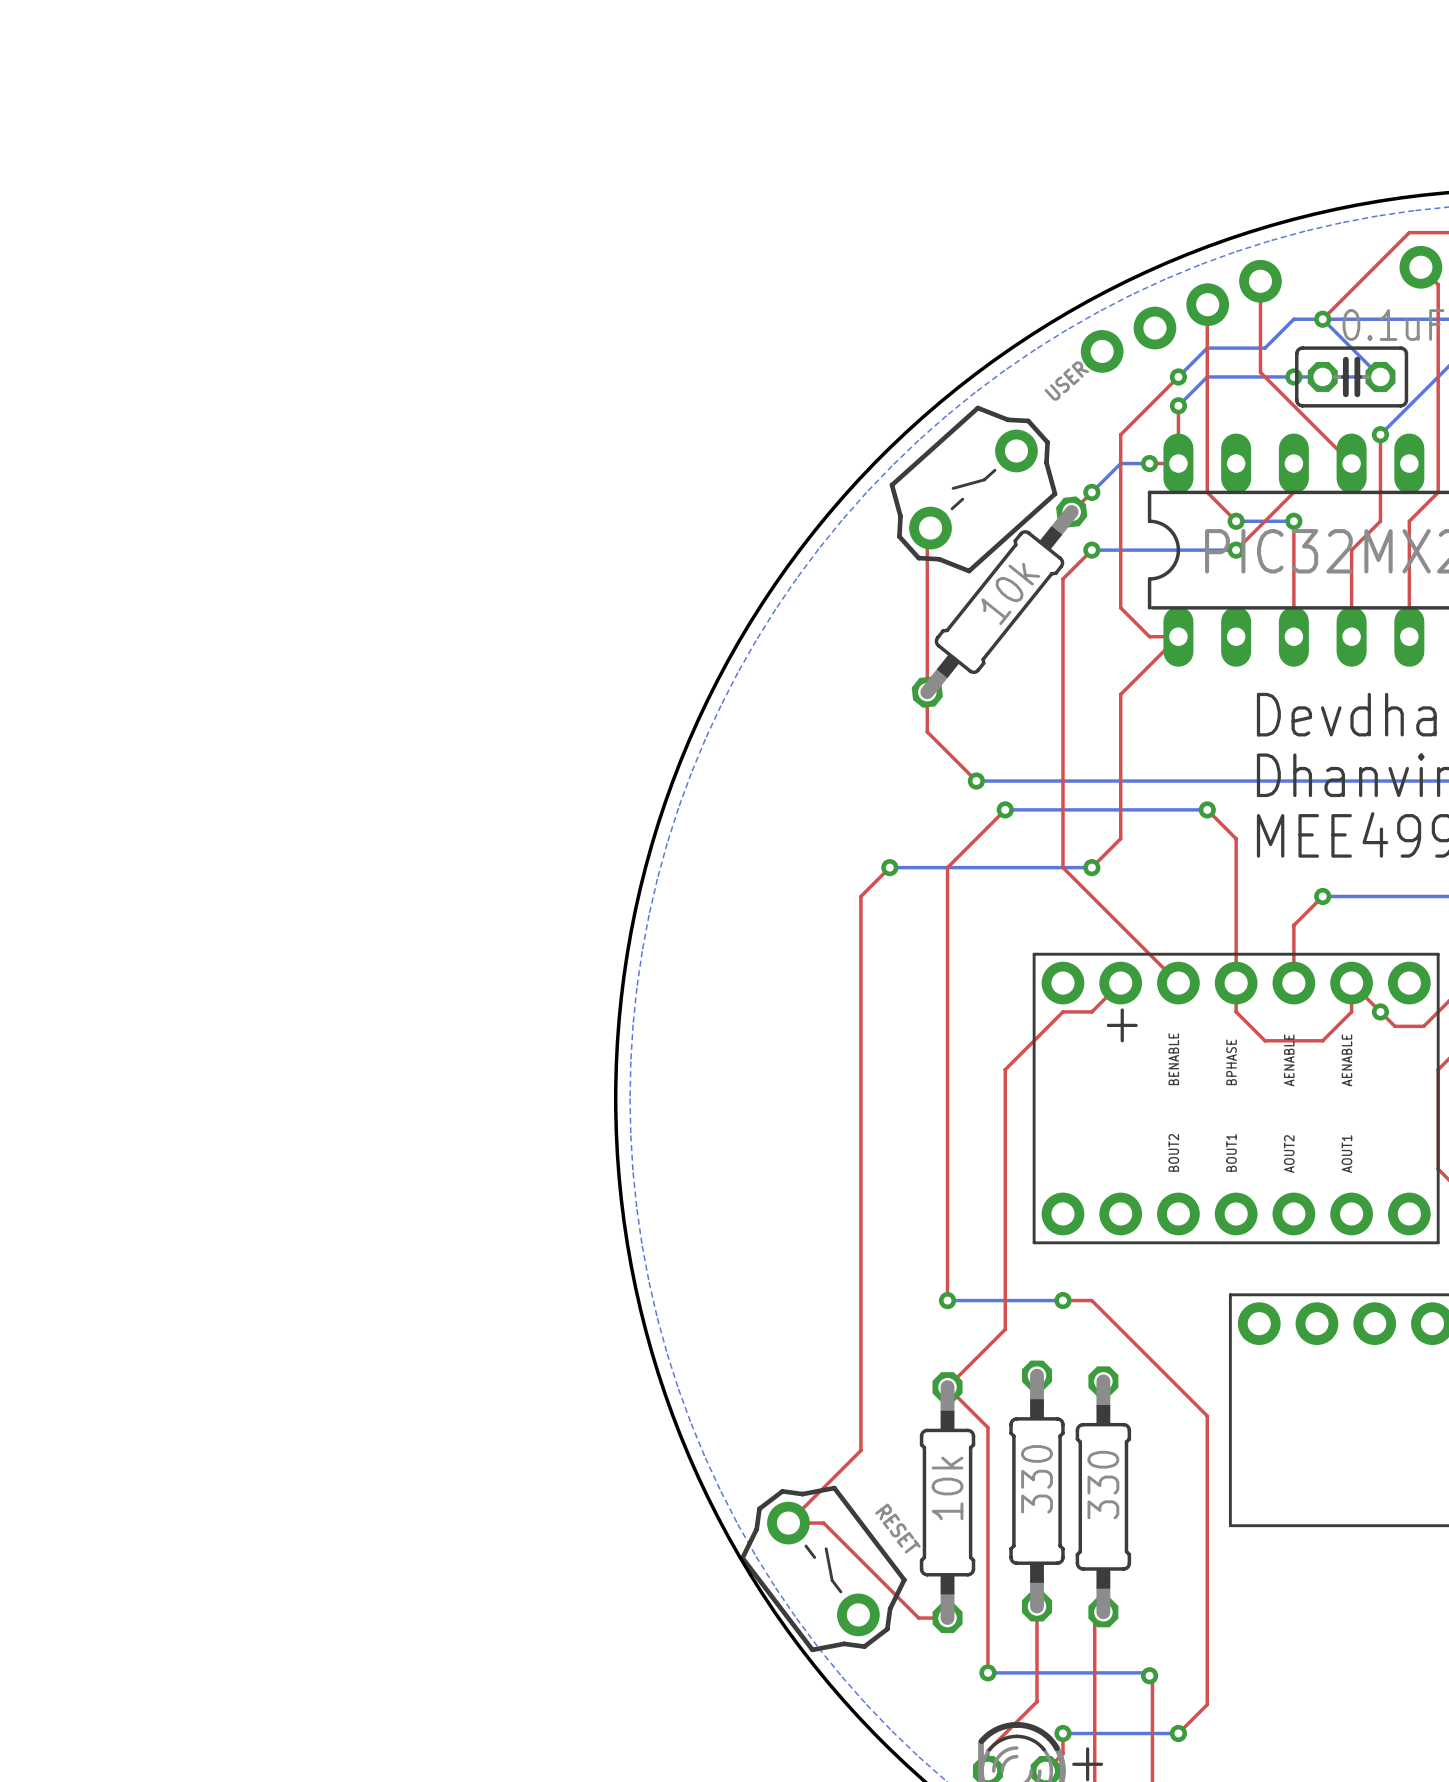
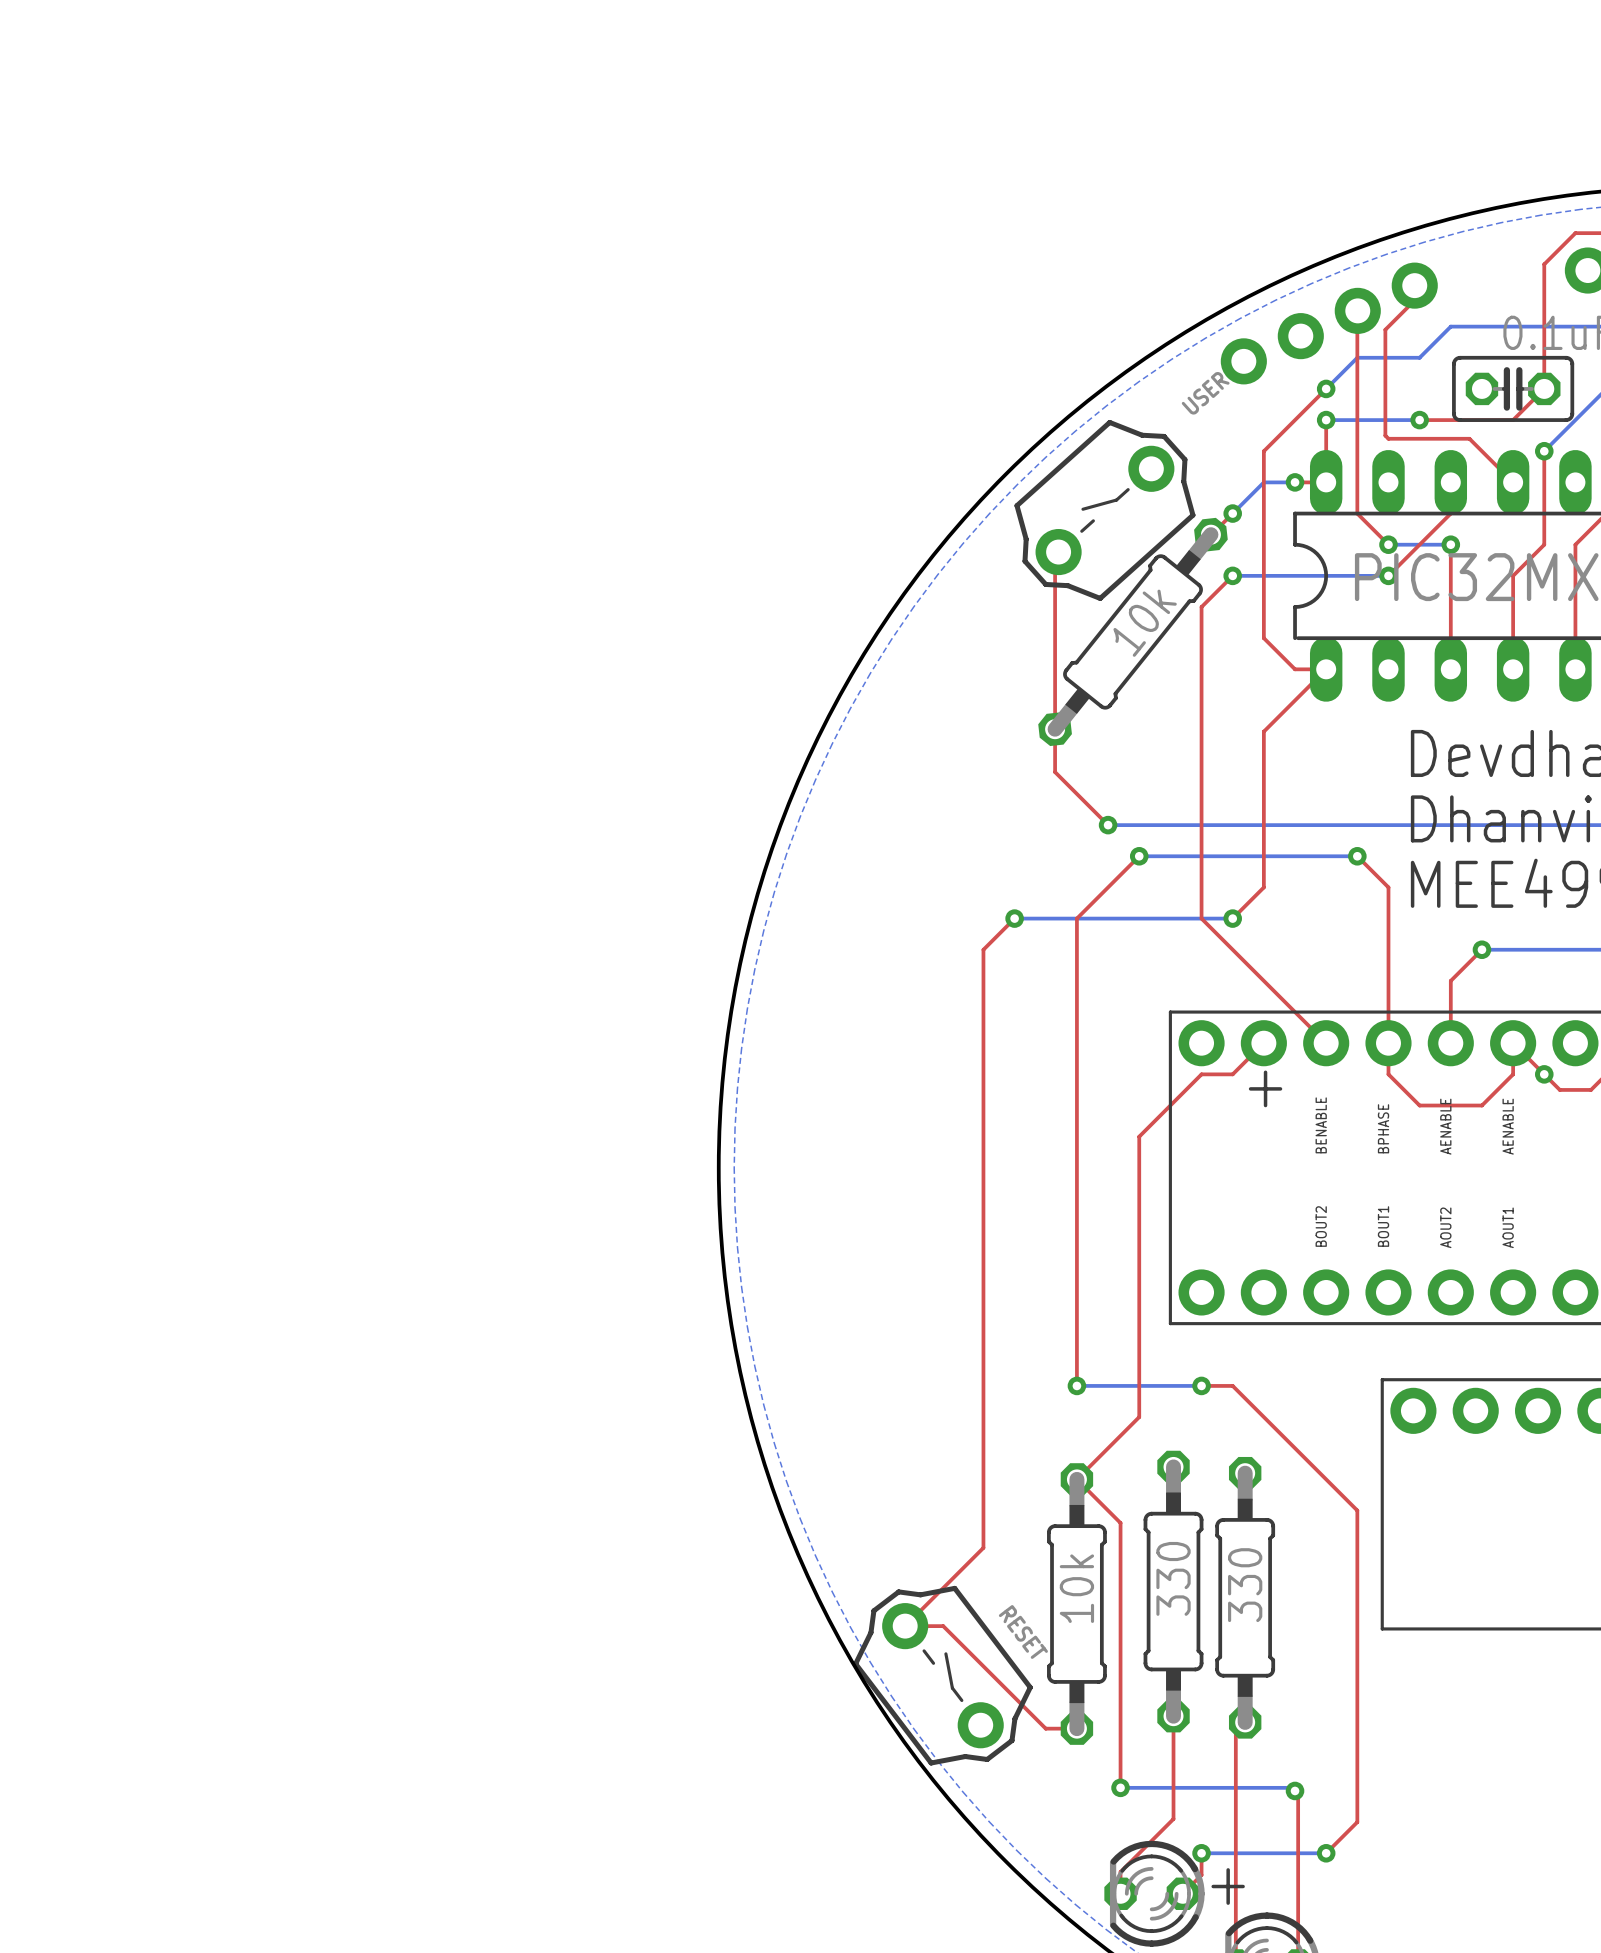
top track: (1380, 261) (1322, 319) -> (1544, 264) (1544, 388) (1513, 420) (1419, 420)
top track: (1260, 294) (1260, 372) (1311, 423) -> (1414, 300) (1385, 329) (1385, 435) (1388, 438) (1469, 438)
bottom track: (1322, 319) (1380, 376) (1207, 376) (1178, 405) -> (1419, 420) (1326, 420)
via: (1322, 319) -> none
via position: (1293, 376) -> (1419, 420)

